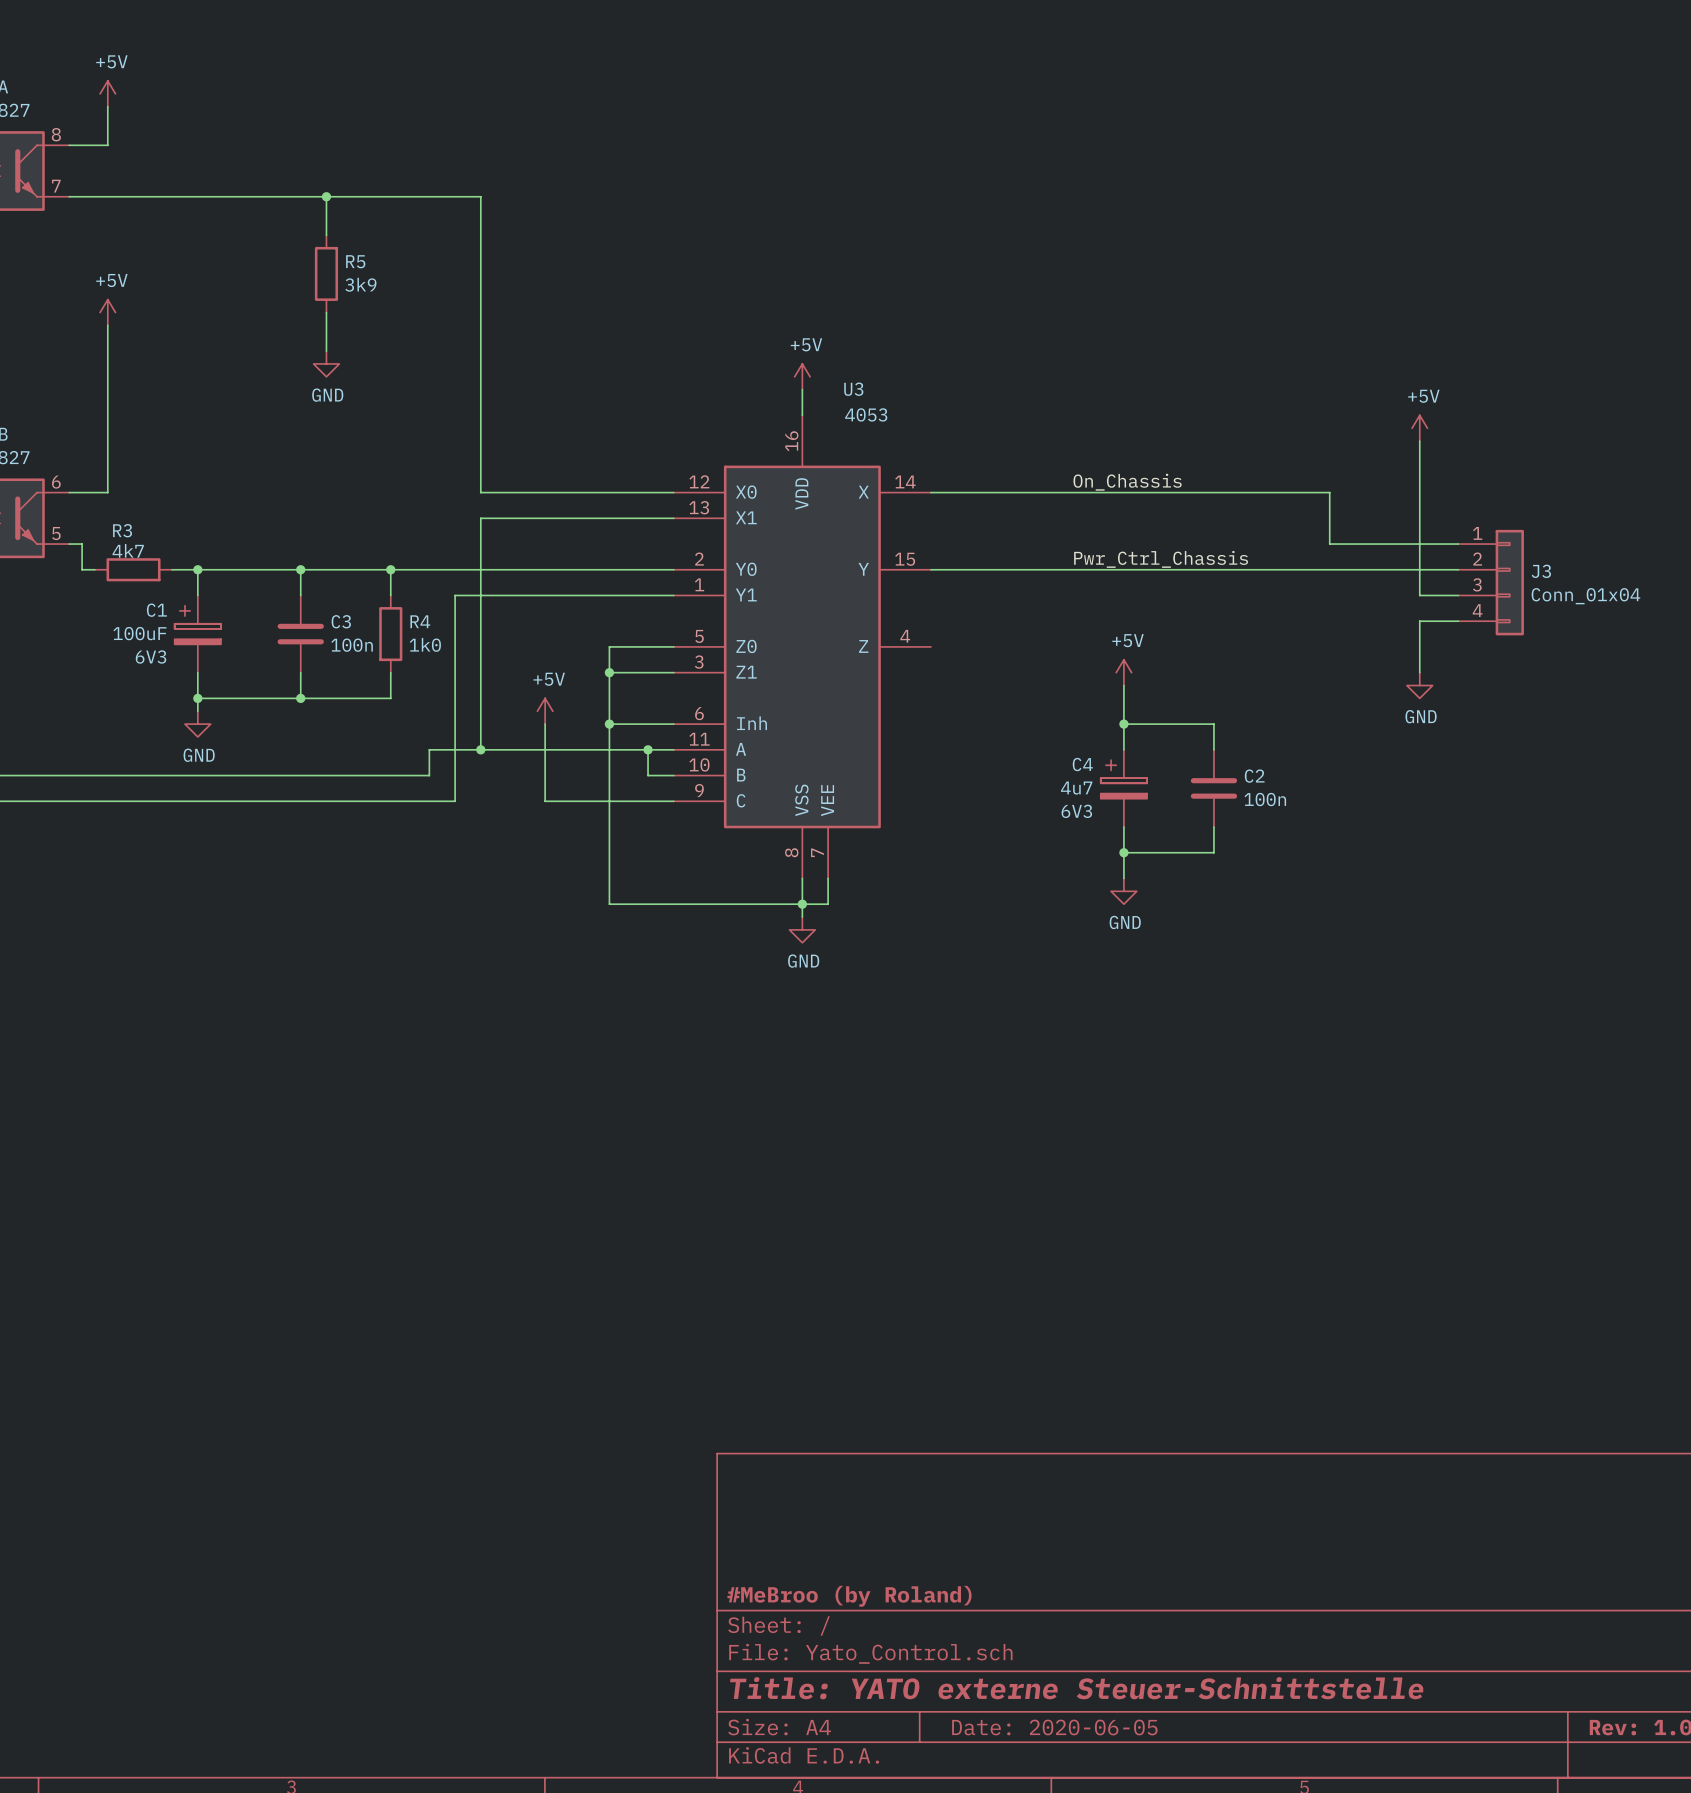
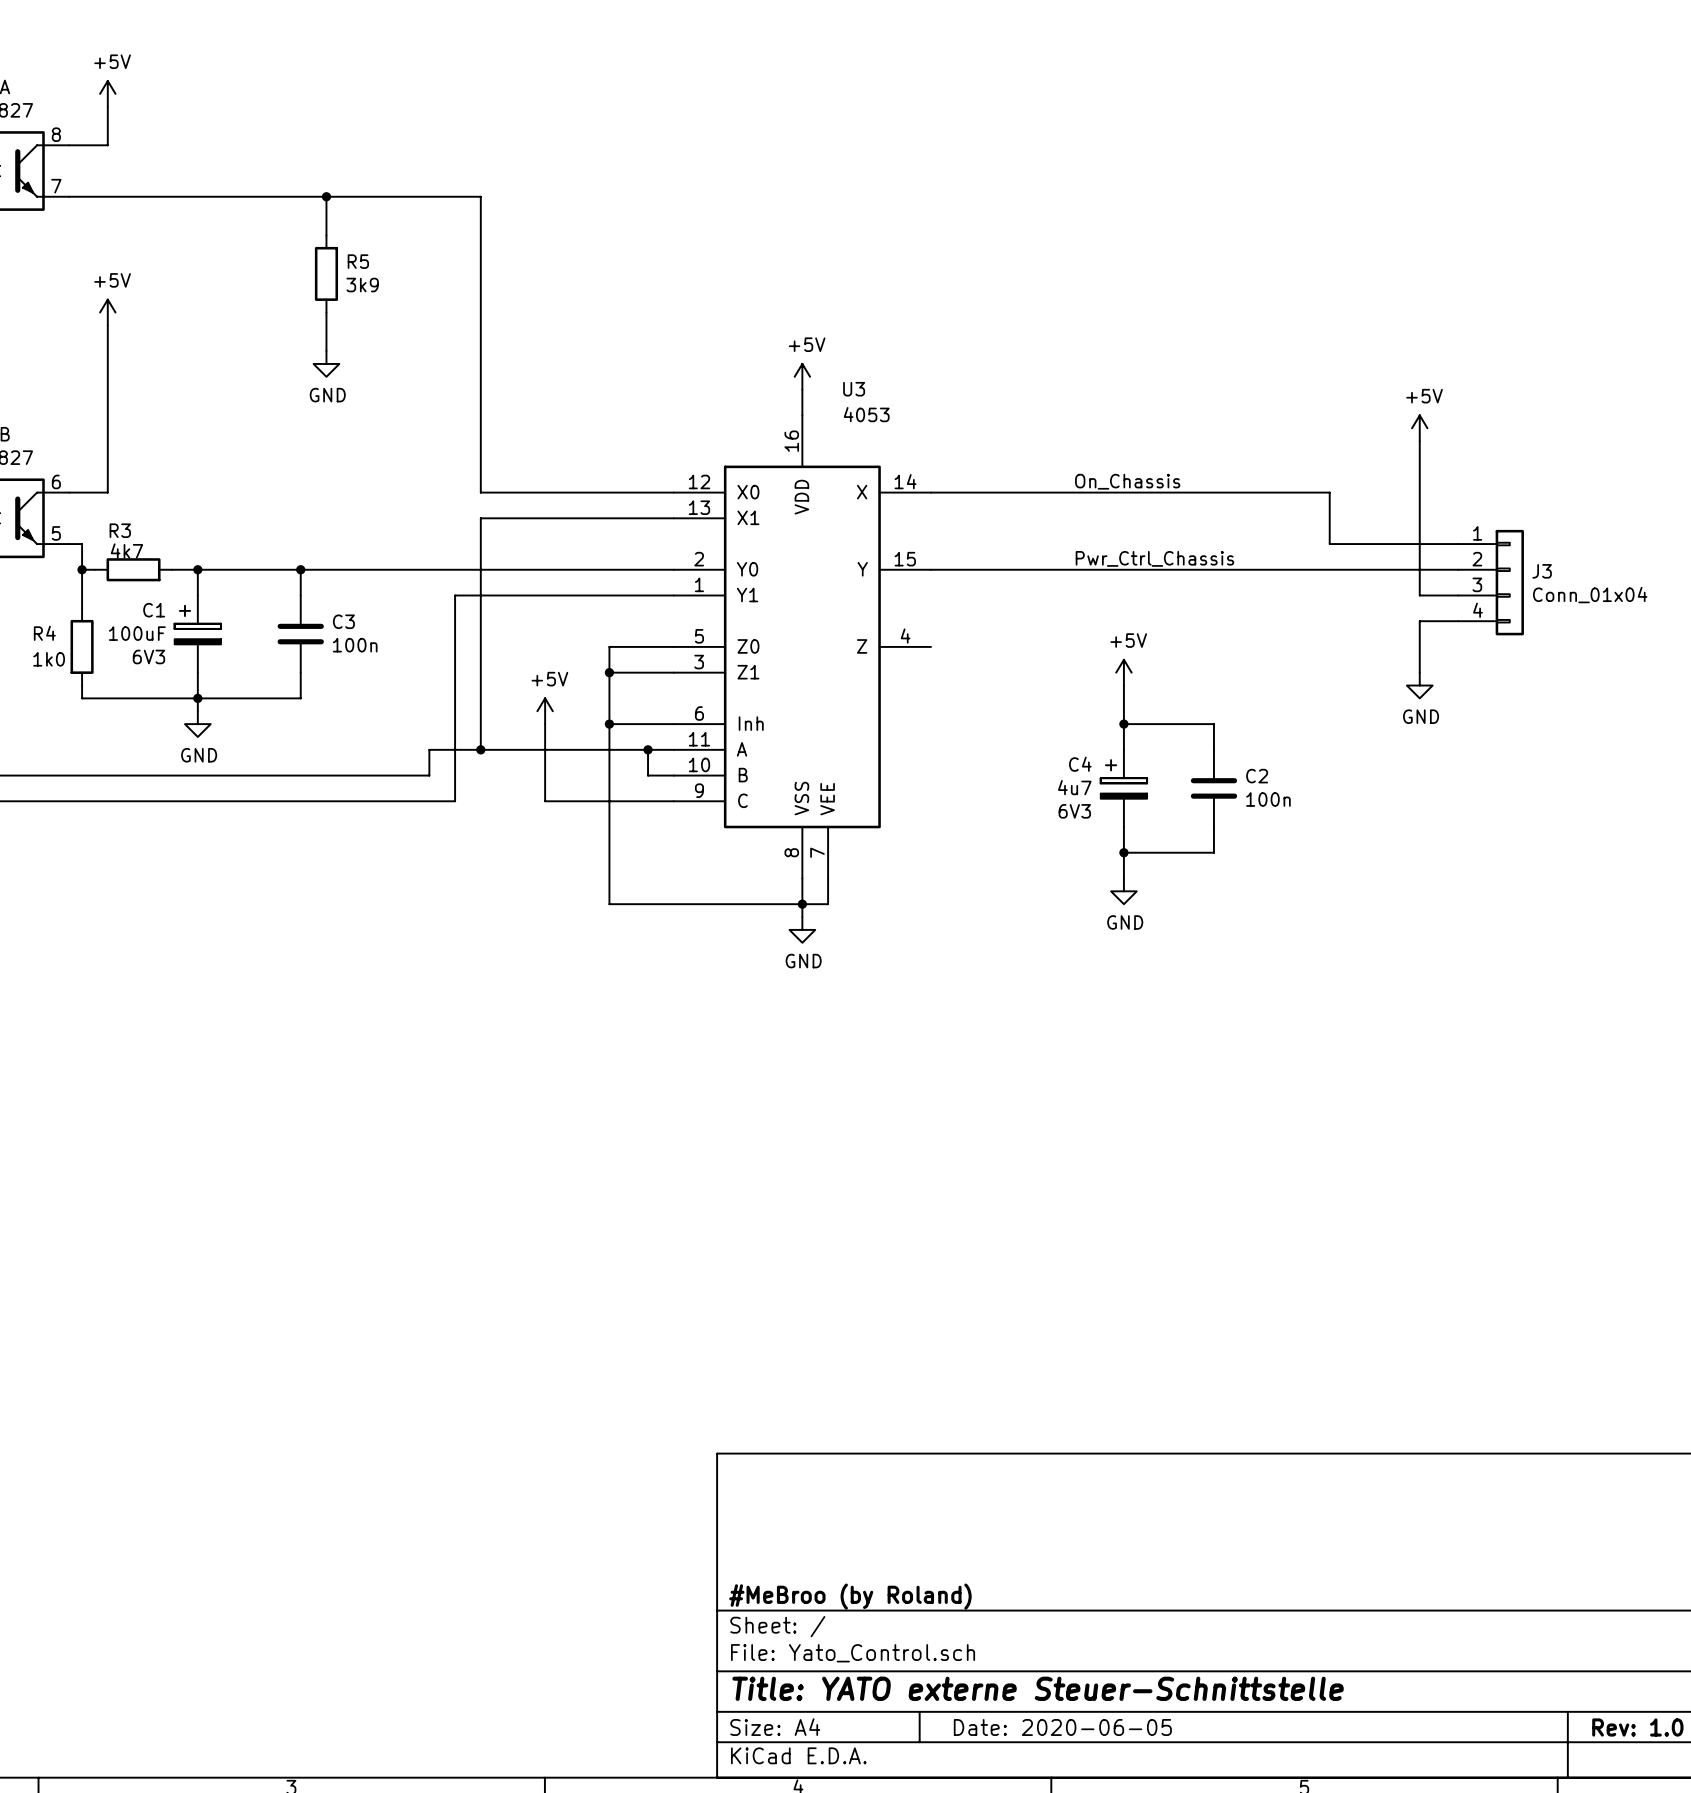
wire: none -> (82, 569) (82, 608)
junction: none -> (82, 569)
wire: (390, 569) (390, 595) -> none
junction: (390, 569) -> none
R4 name position: R4 (420, 621) -> R4 (44, 633)
R4 position: (390, 634) -> (82, 646)
R4 value position: 1k0 (425, 644) -> 1k0 (49, 659)
wire: (390, 672) (390, 698) (300, 698) -> none
wire: none -> (82, 685) (82, 698) (197, 698)
junction: (300, 698) -> none

